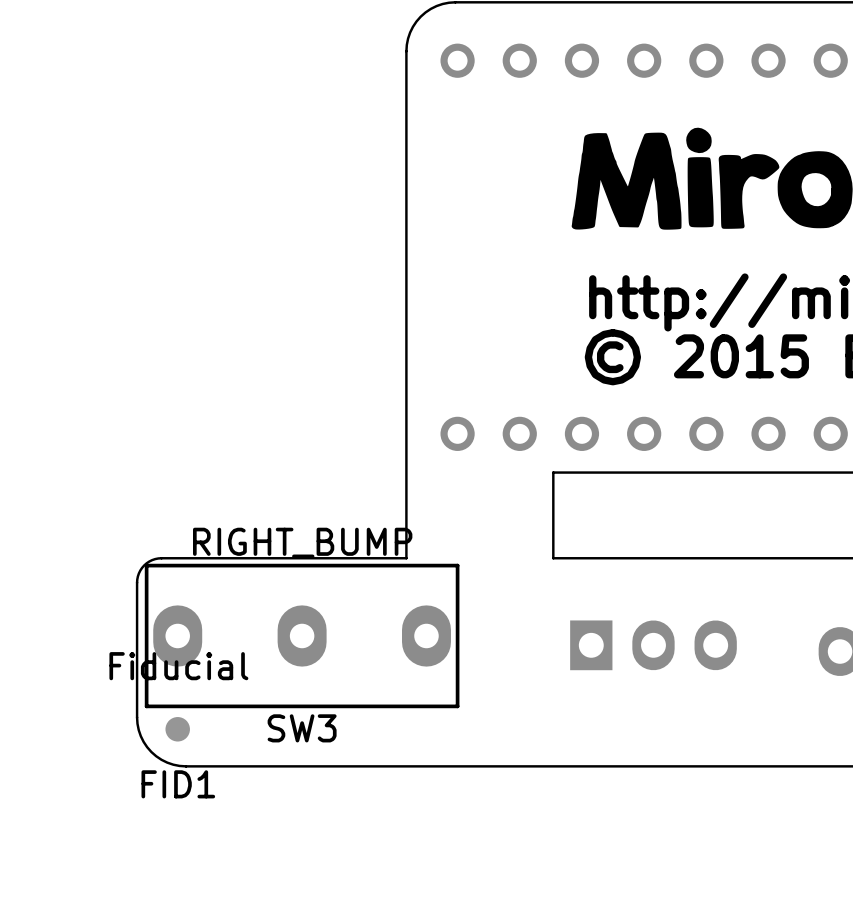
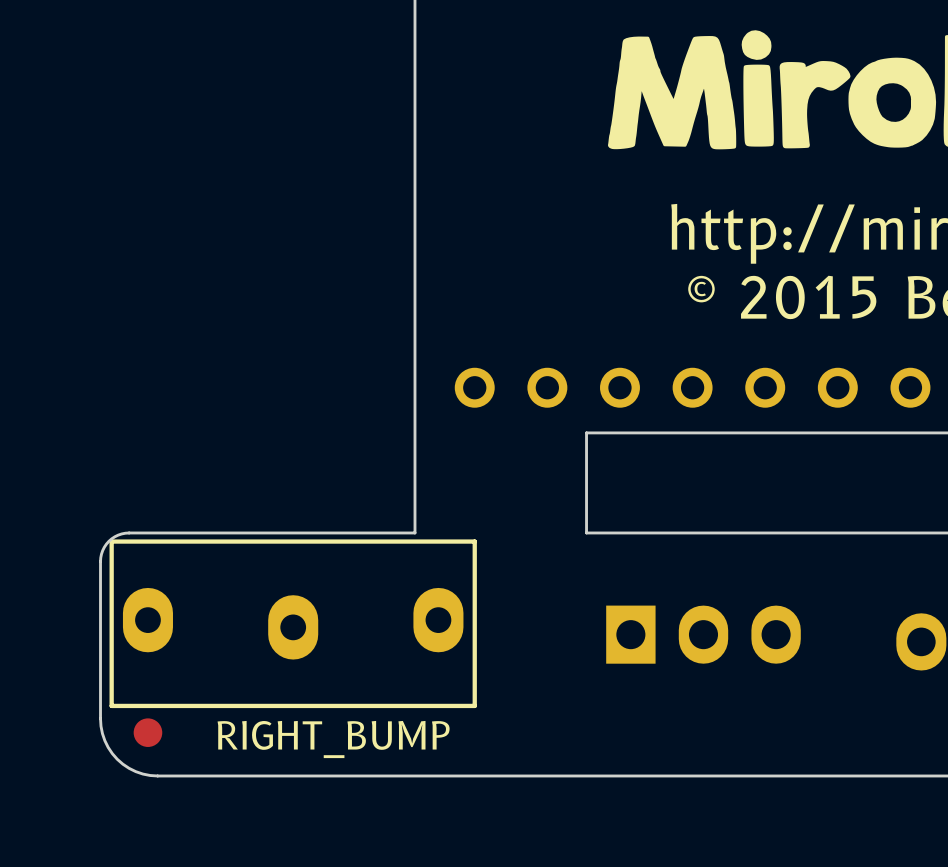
SW3: RIGHT_BUMP (302, 635) -> none
part: none -> RIGHT_BUMP (293, 623)
FID1 value: Fiducial (178, 666) -> none
FID1 name: FID1 (178, 784) -> none

